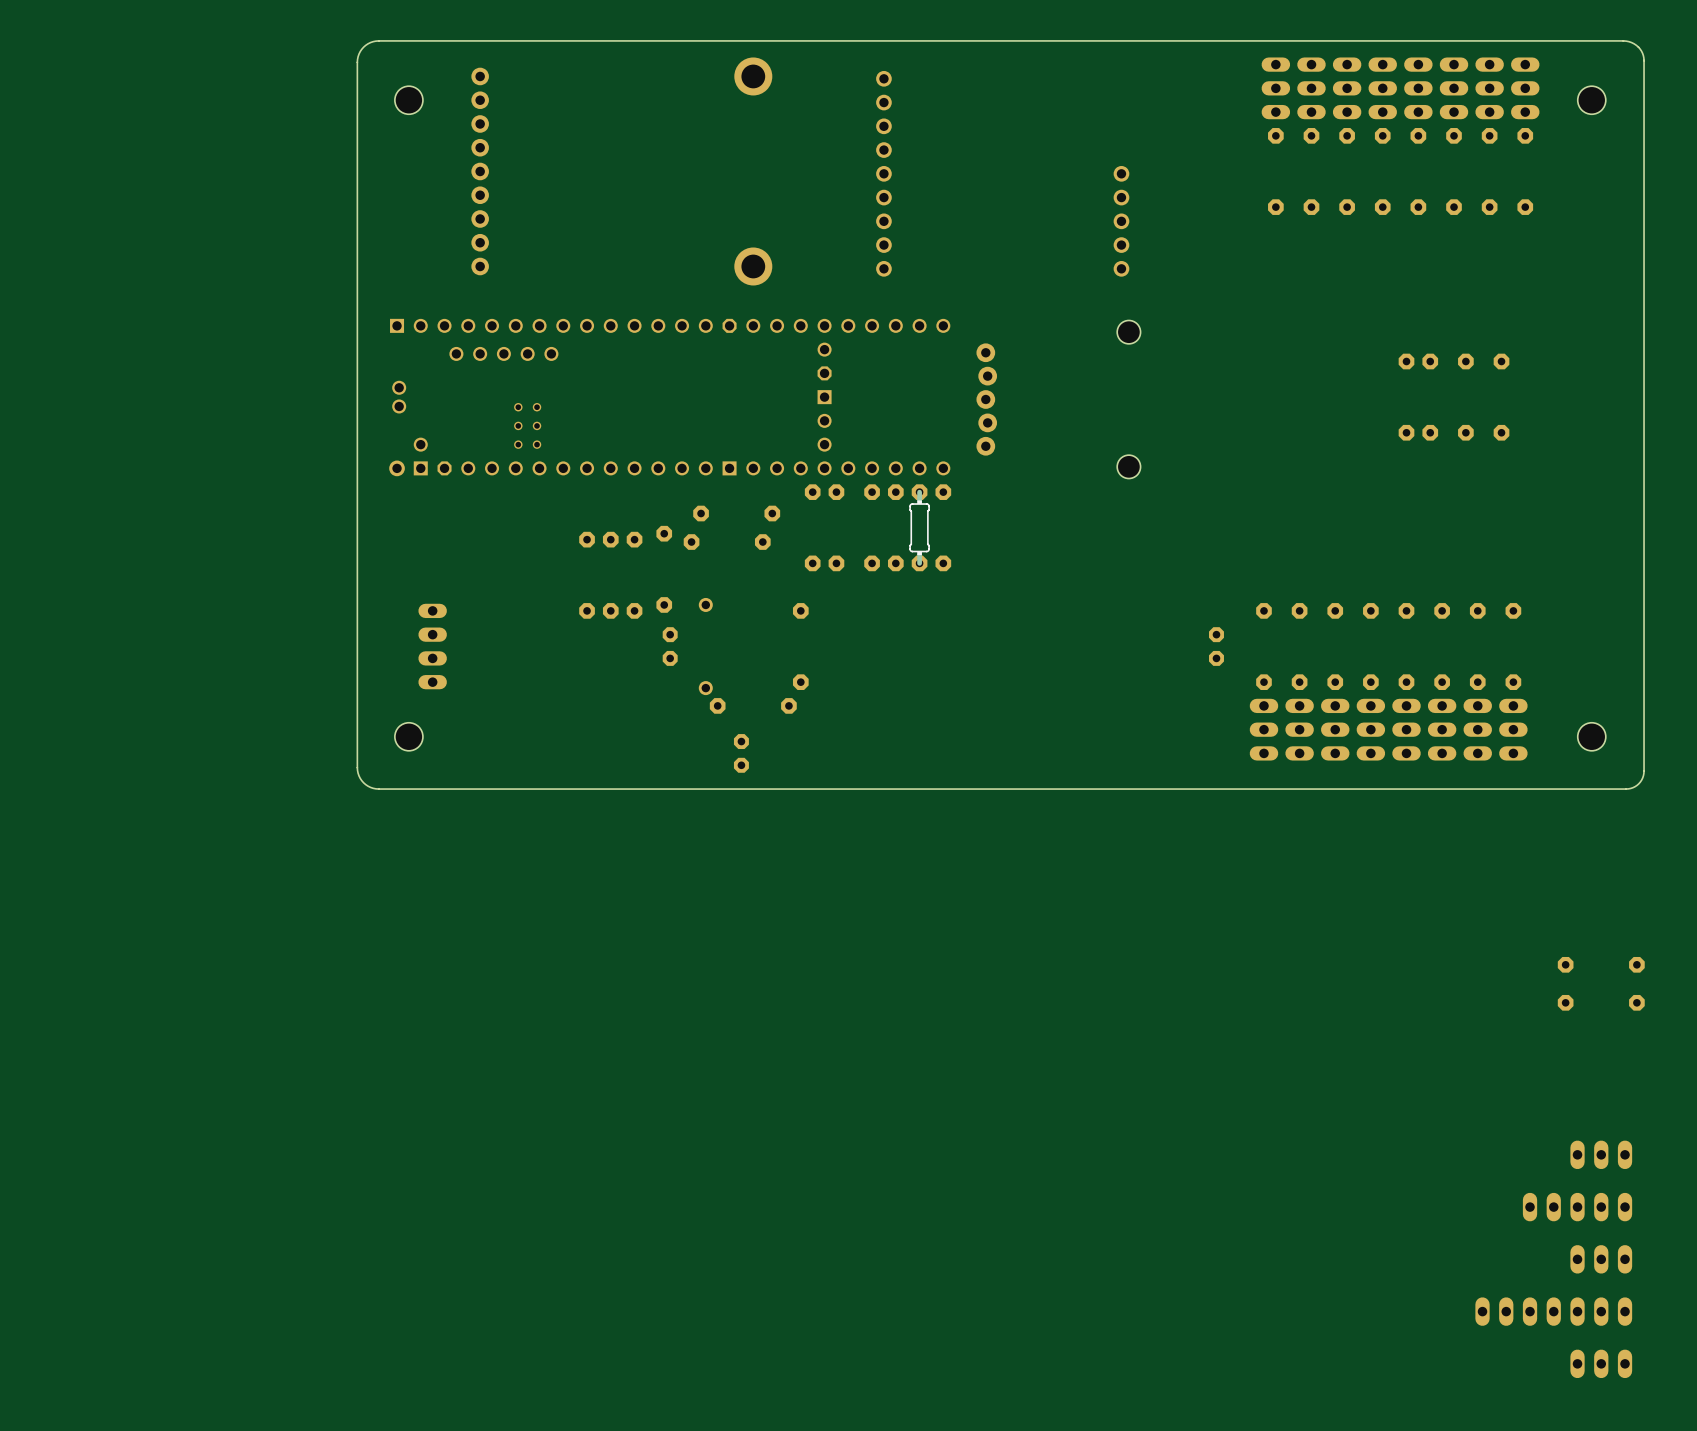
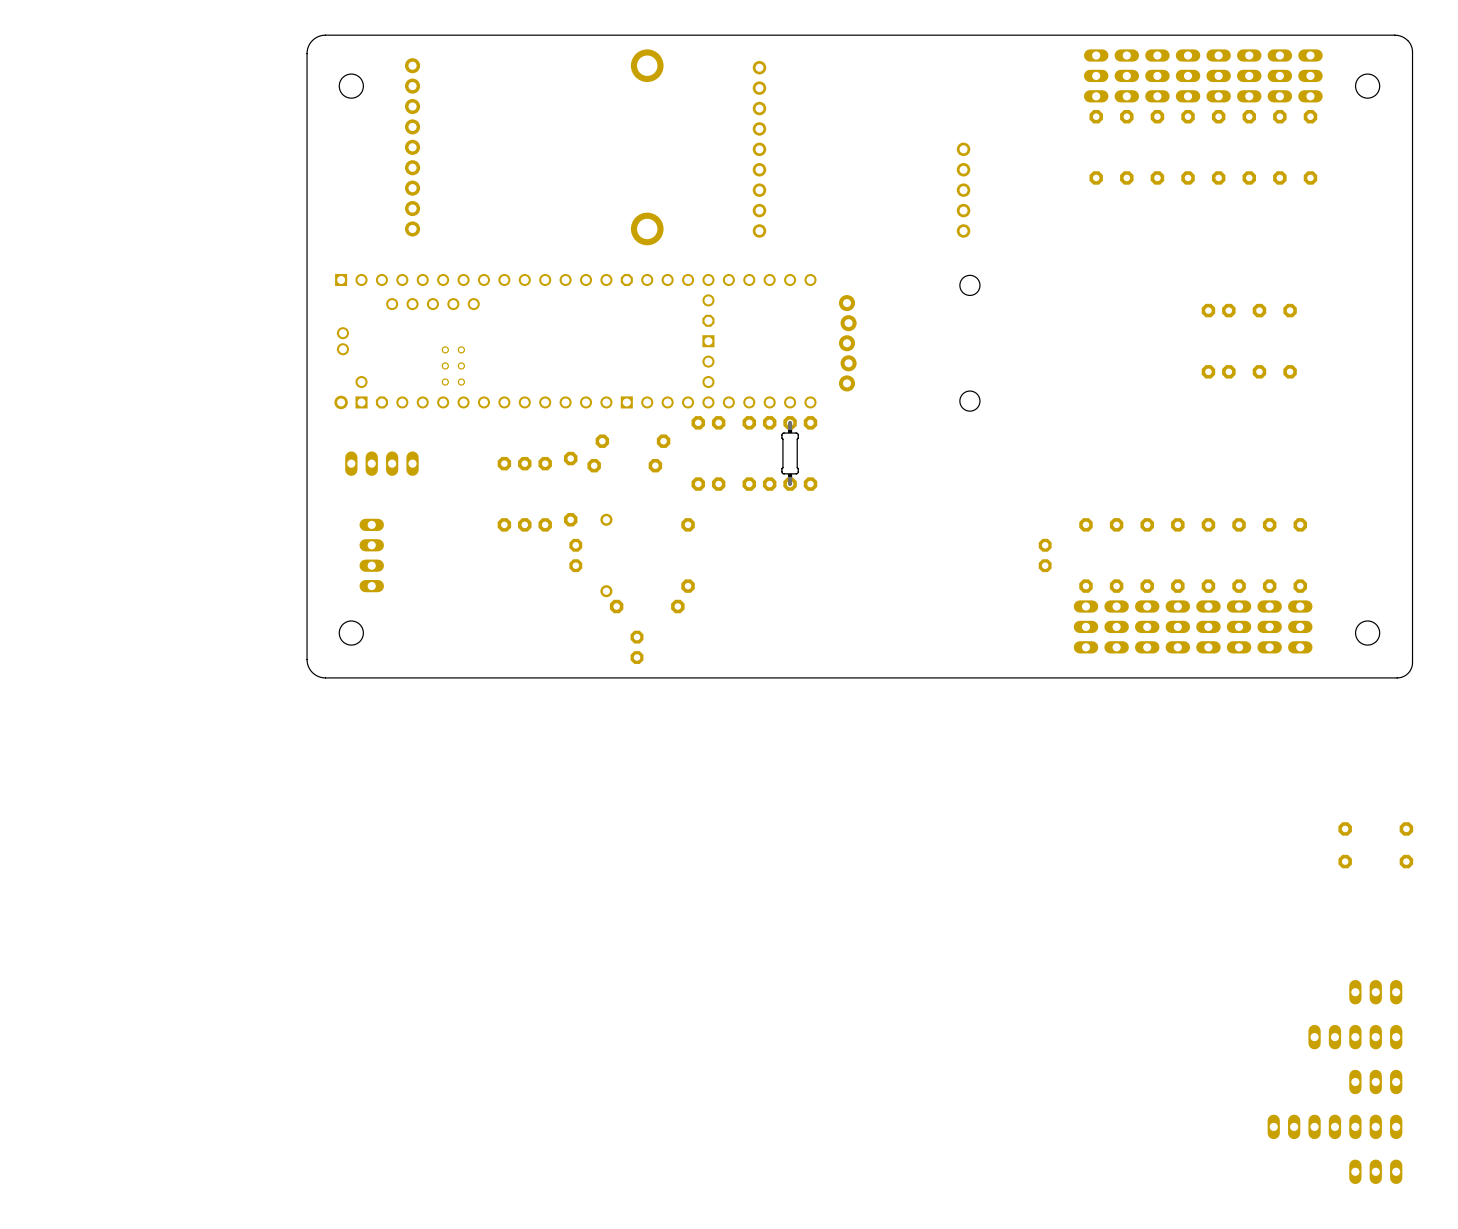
part: none -> (381, 463)

